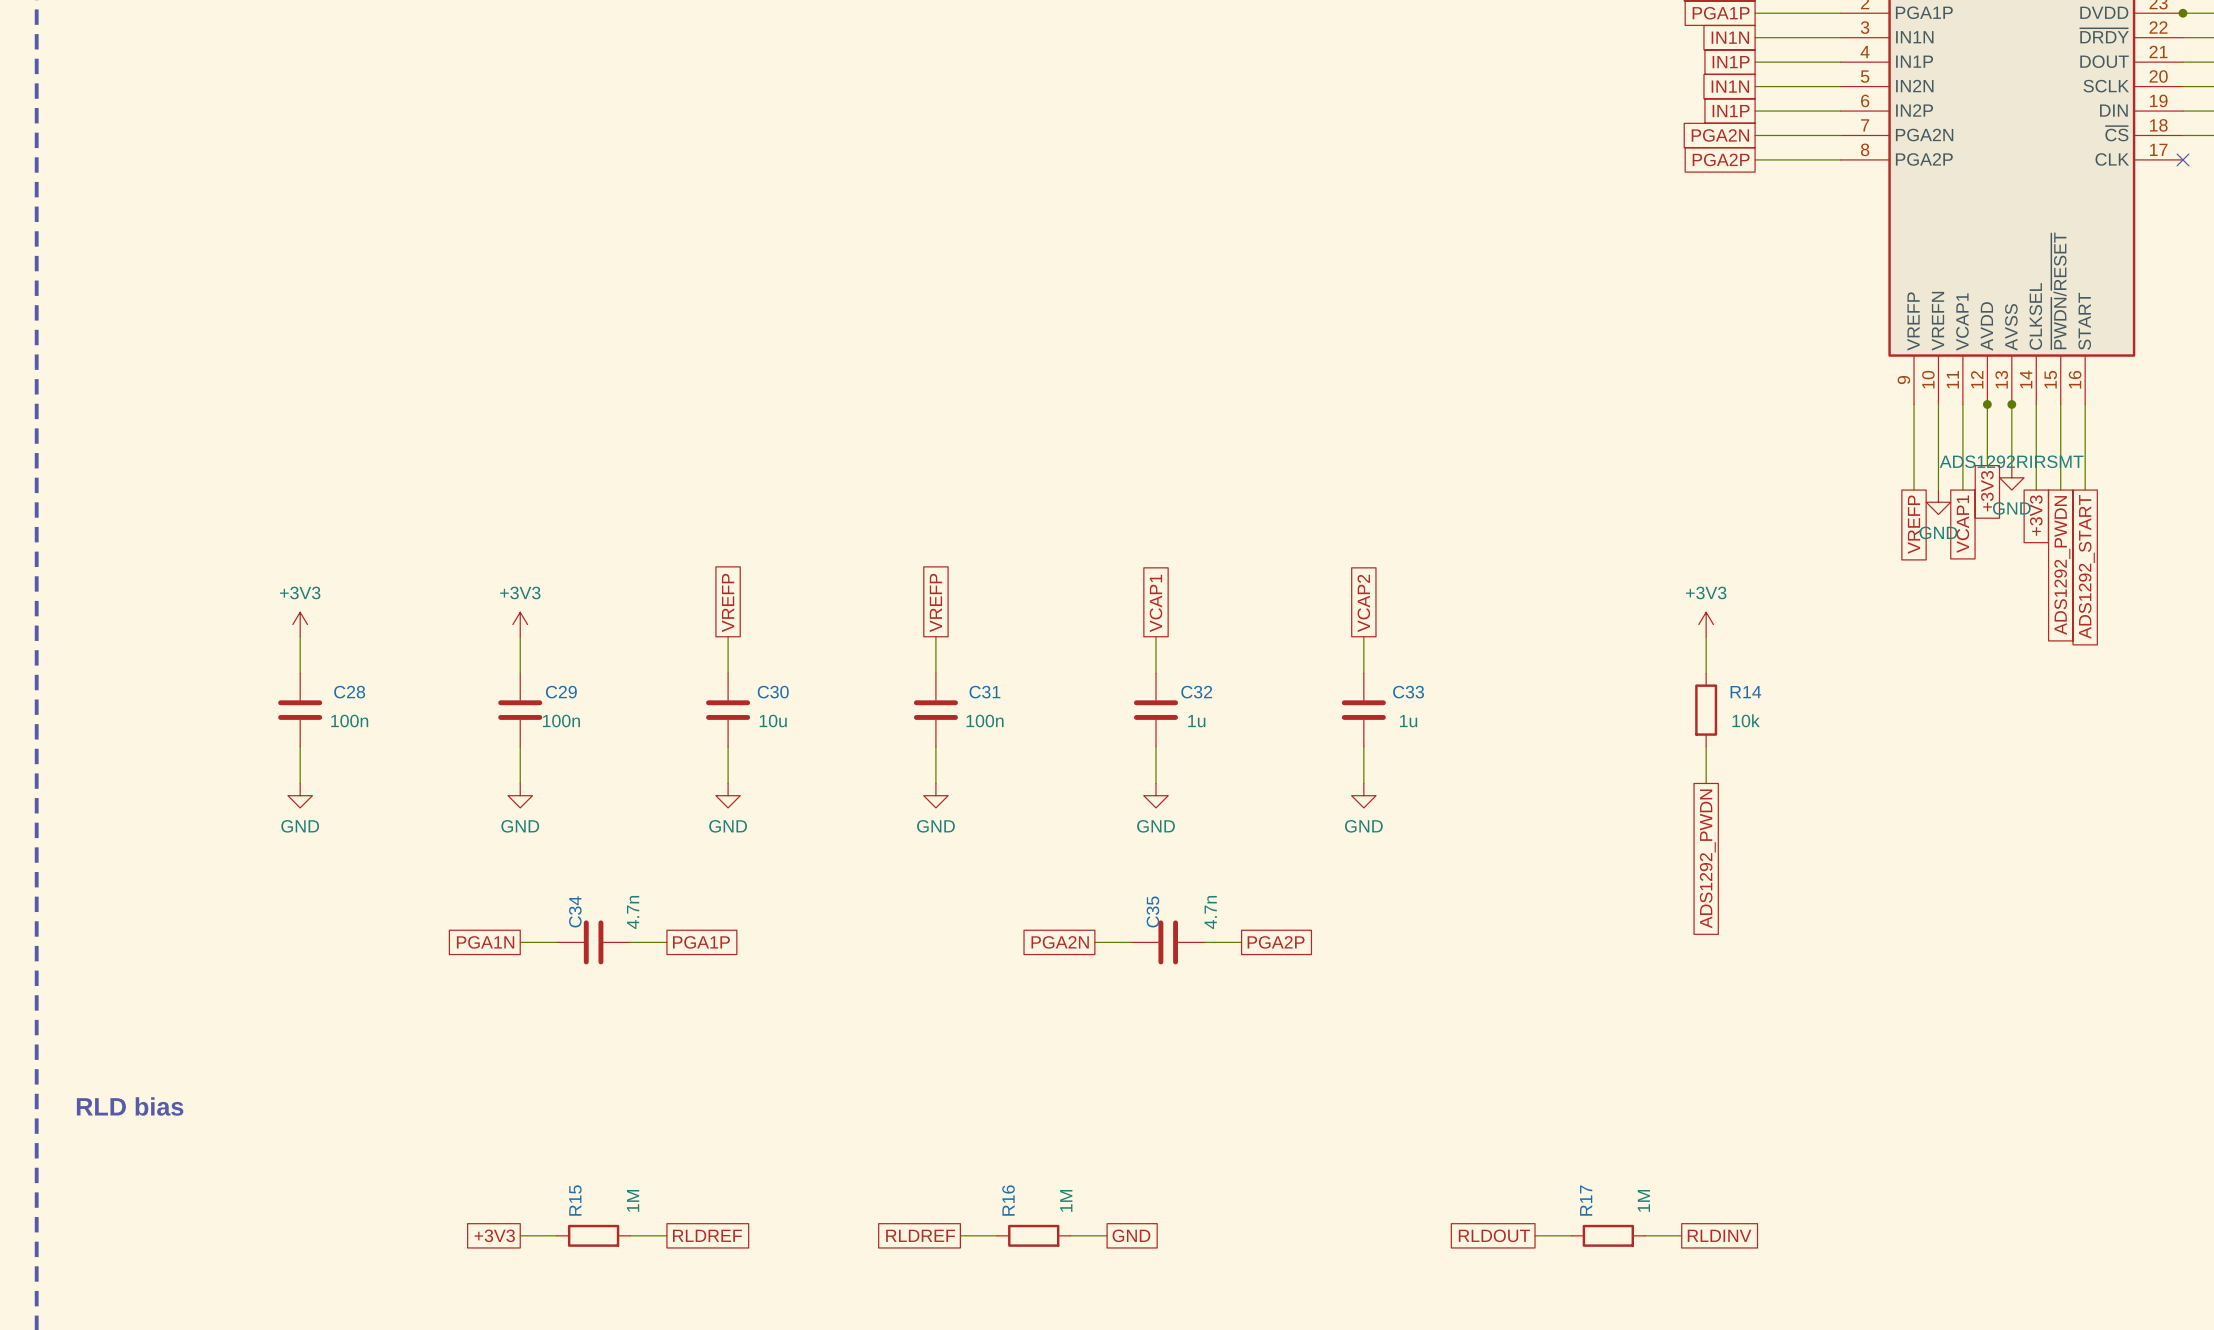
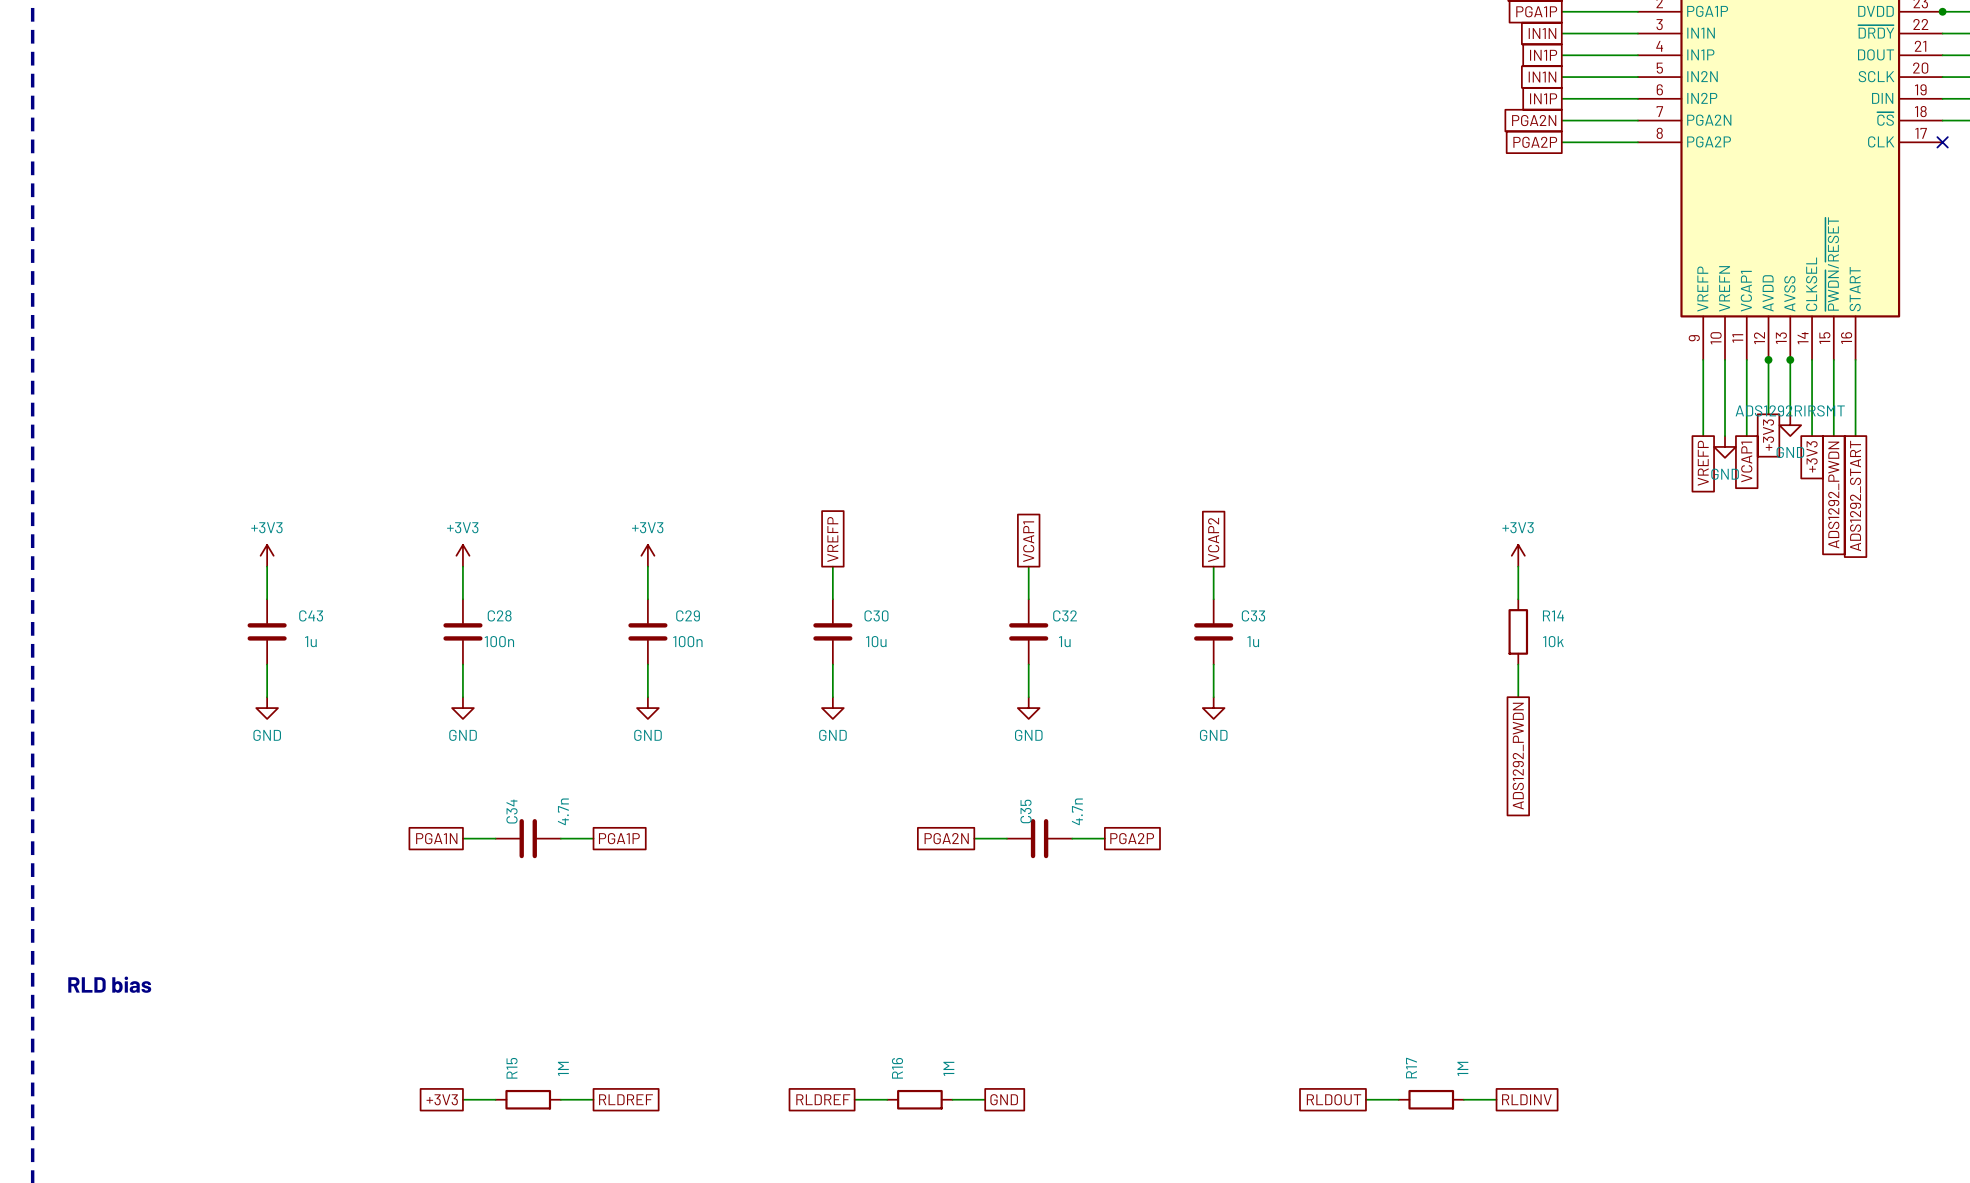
global label: VREFP (728, 602) -> none
power symbol: none -> +3V3 (647, 555)
C28 name: C28 (349, 692) -> C43 (311, 615)
C29 name: C29 (561, 692) -> C28 (499, 615)
C30 name: C30 (773, 692) -> C29 (688, 615)
C31 name: C31 (984, 692) -> C30 (876, 615)
C28 value: 100n (349, 721) -> 1u (310, 641)
C30 value: 10u (773, 721) -> 100n (687, 641)
C31 value: 100n (985, 721) -> 10u (876, 641)

